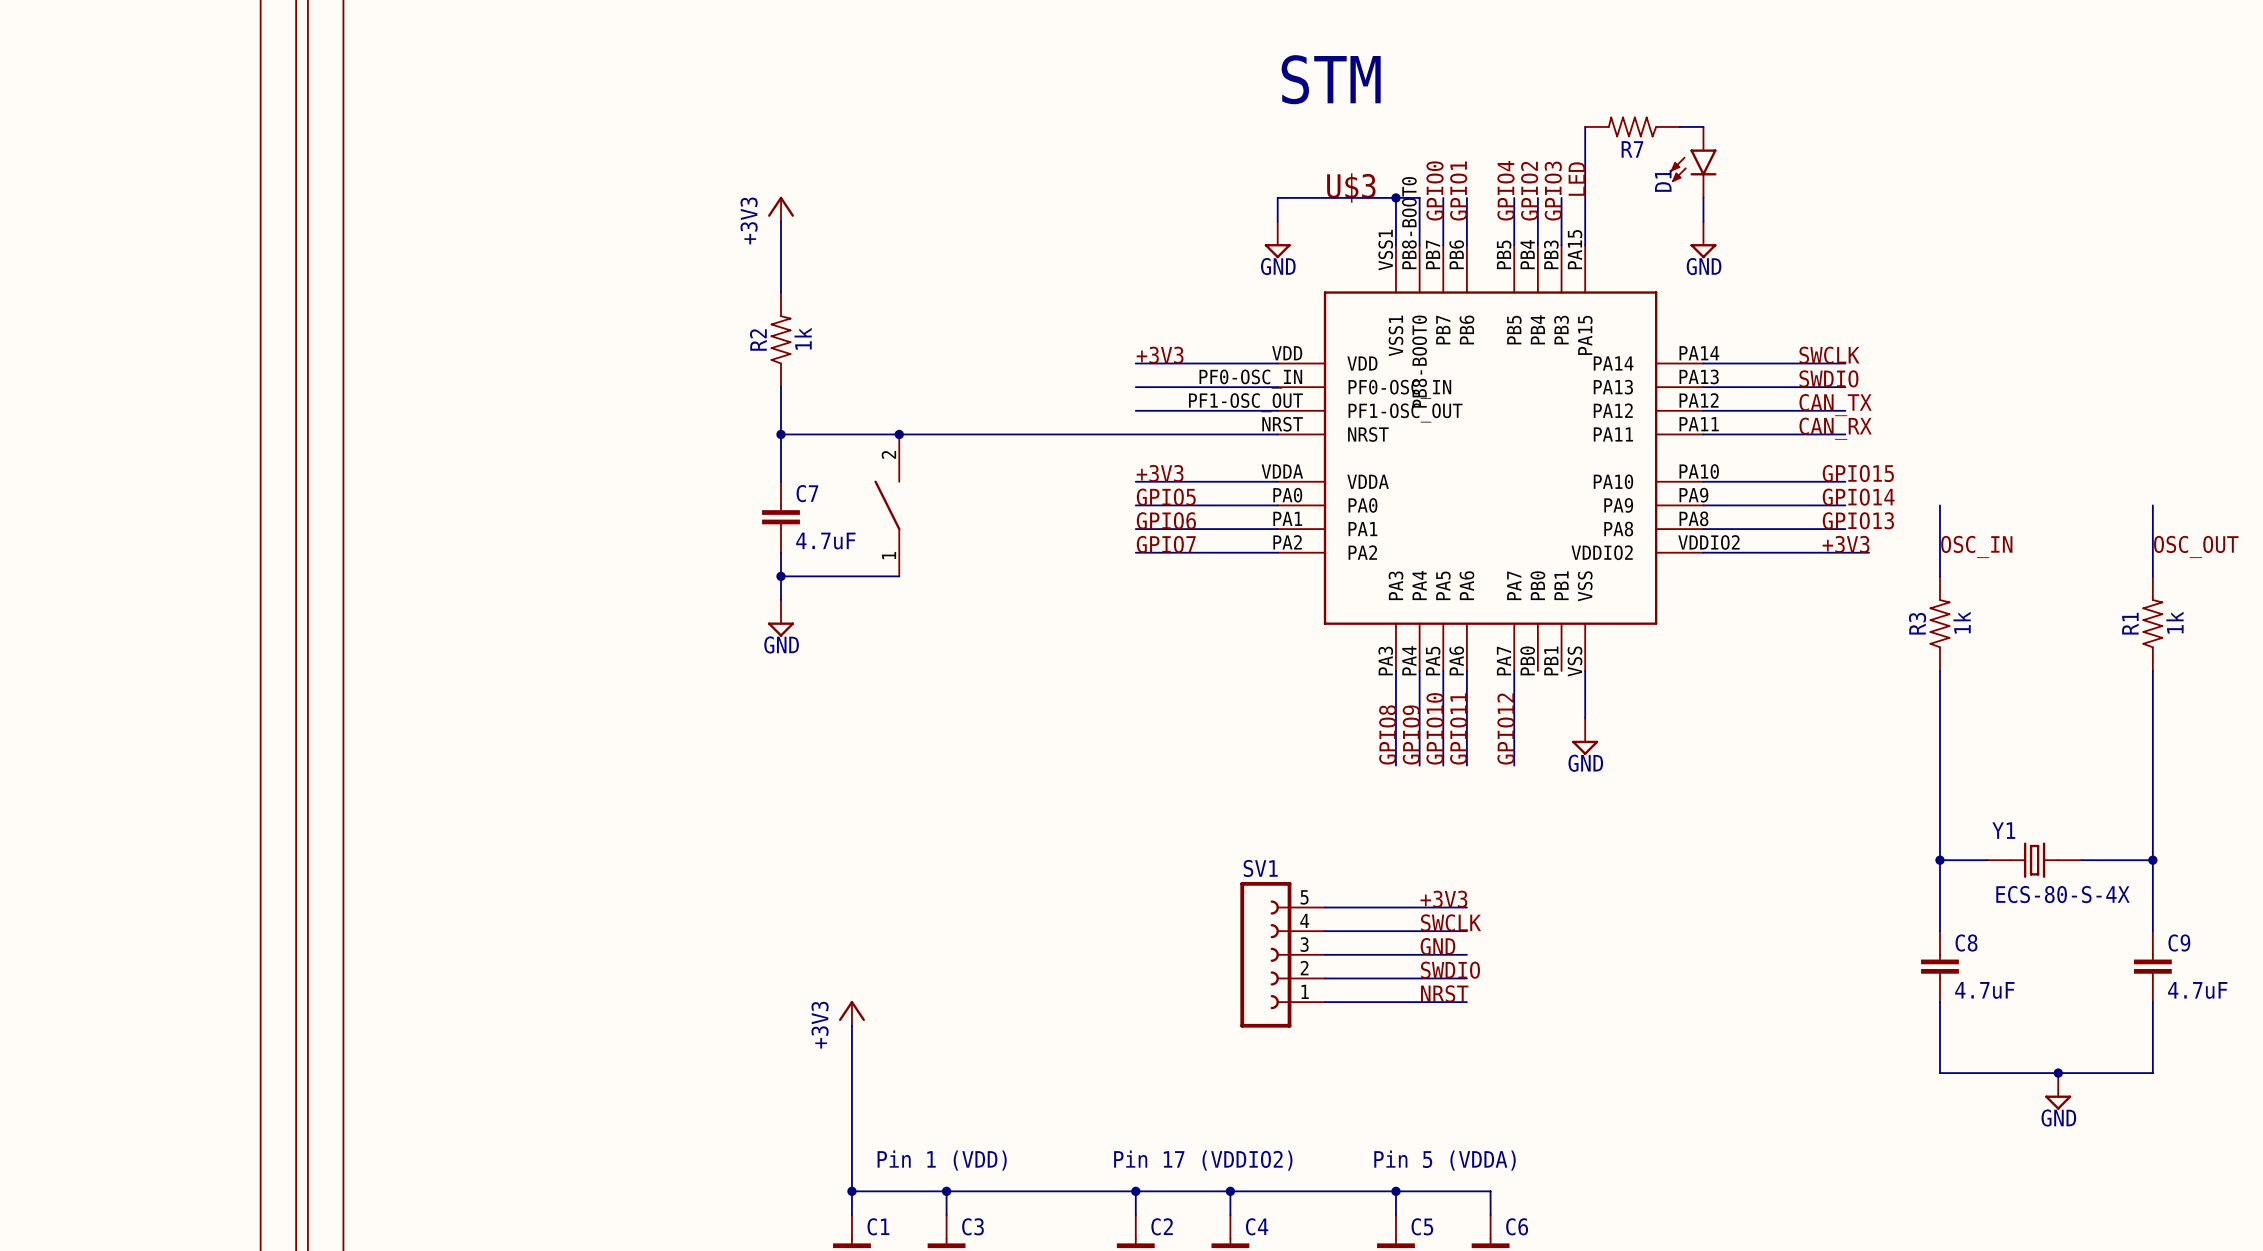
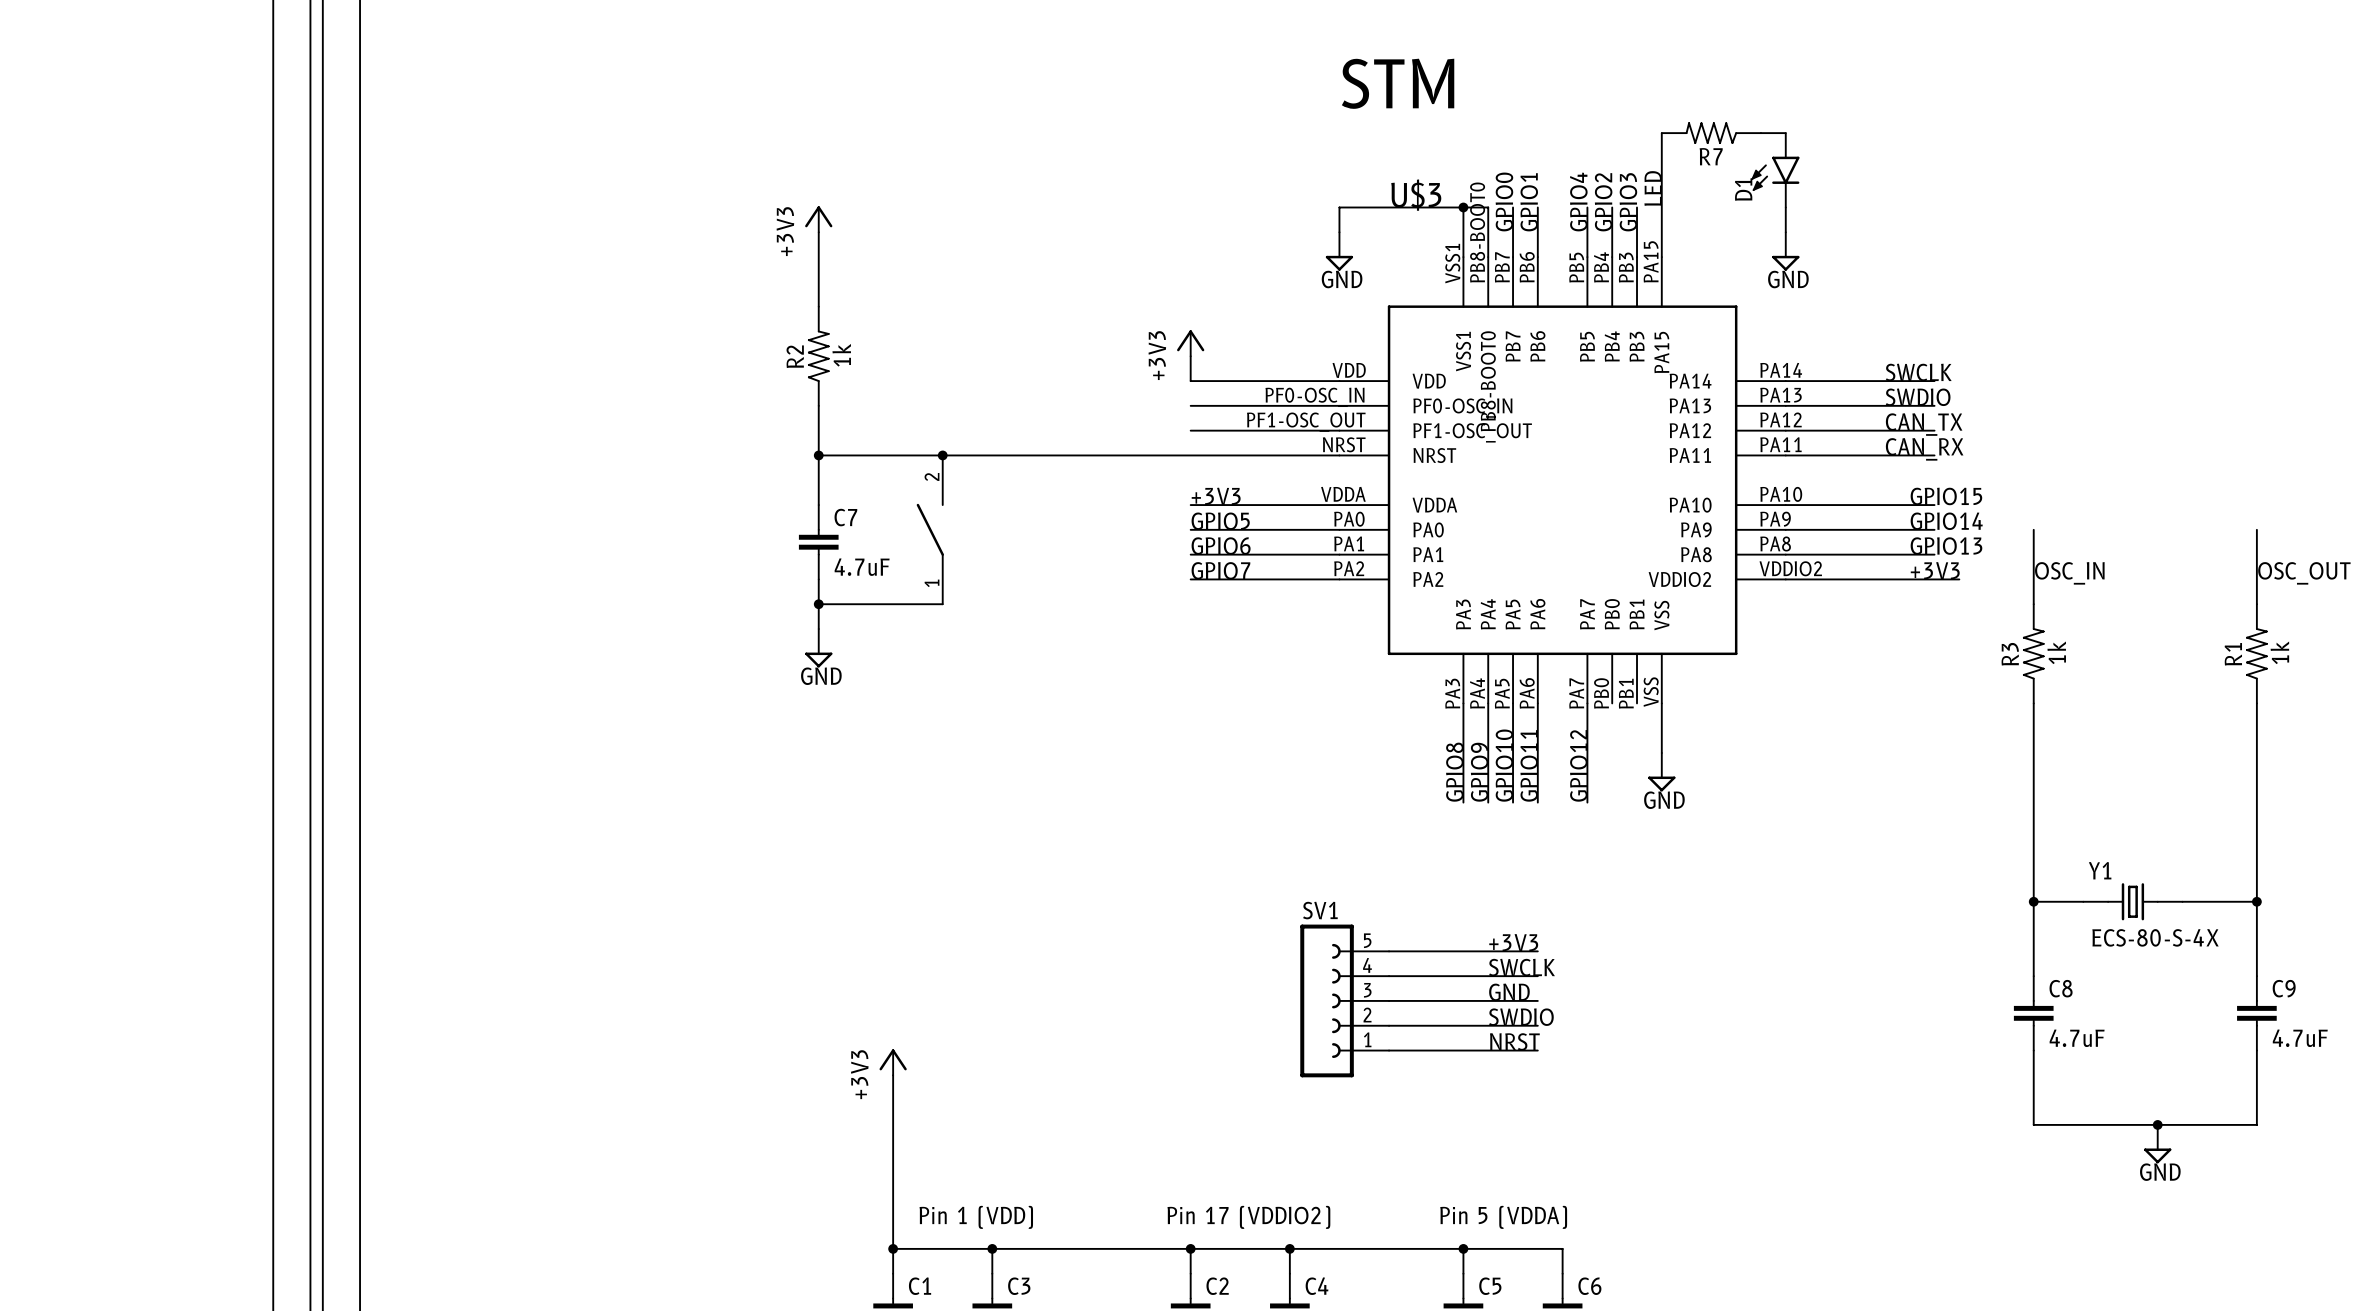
power symbol: none -> +3V3 (1190, 343)
wire: none -> (1190, 356) (1190, 381)
label: +3V3 (1160, 355) -> none

